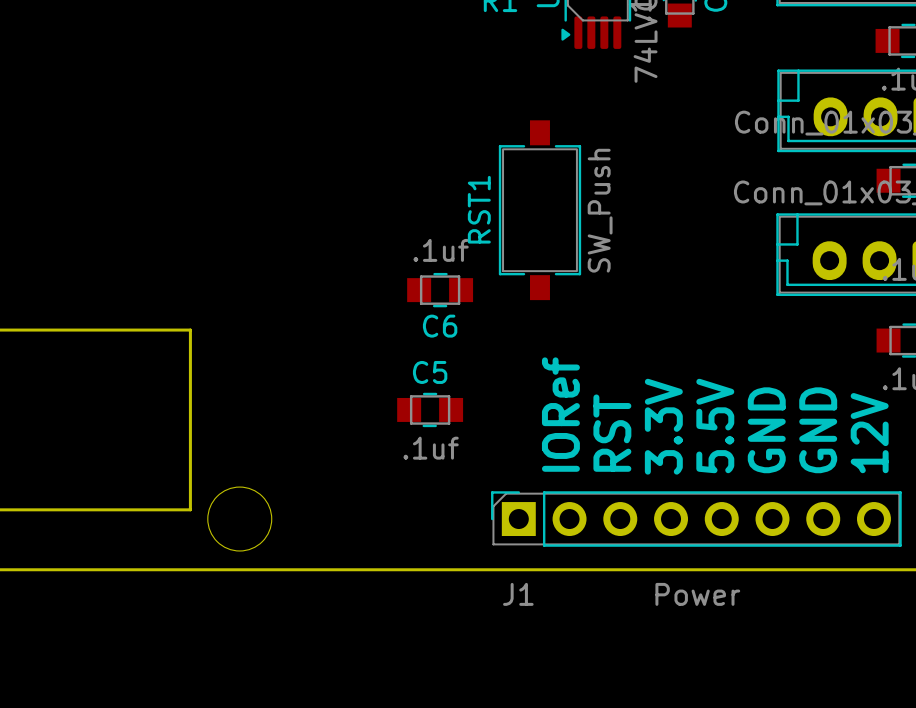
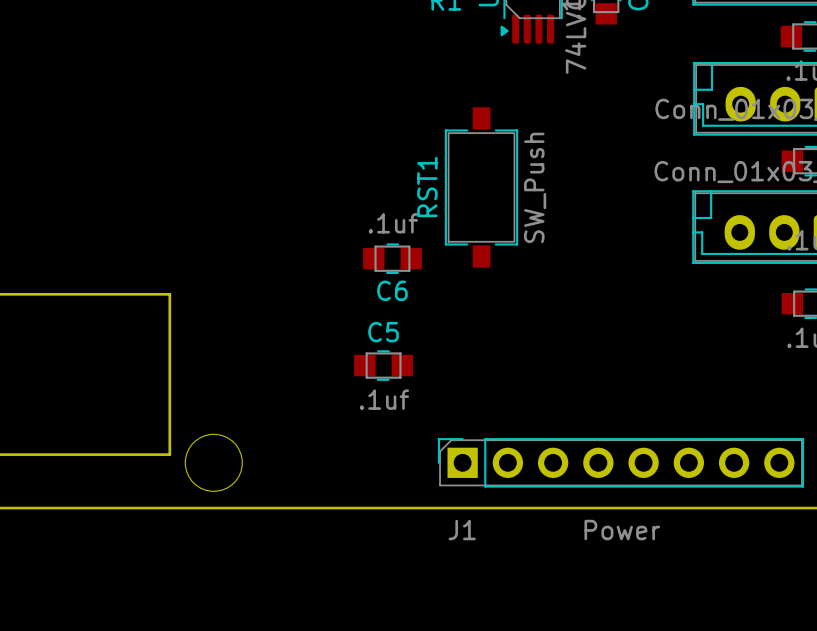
text: IORef (560, 414) -> none
text: 5.5V (715, 425) -> none
text: 3.3V (663, 426) -> none
text: GND (766, 430) -> none
text: GND (818, 430) -> none
text: RST (612, 433) -> none
text: 12V (869, 433) -> none

